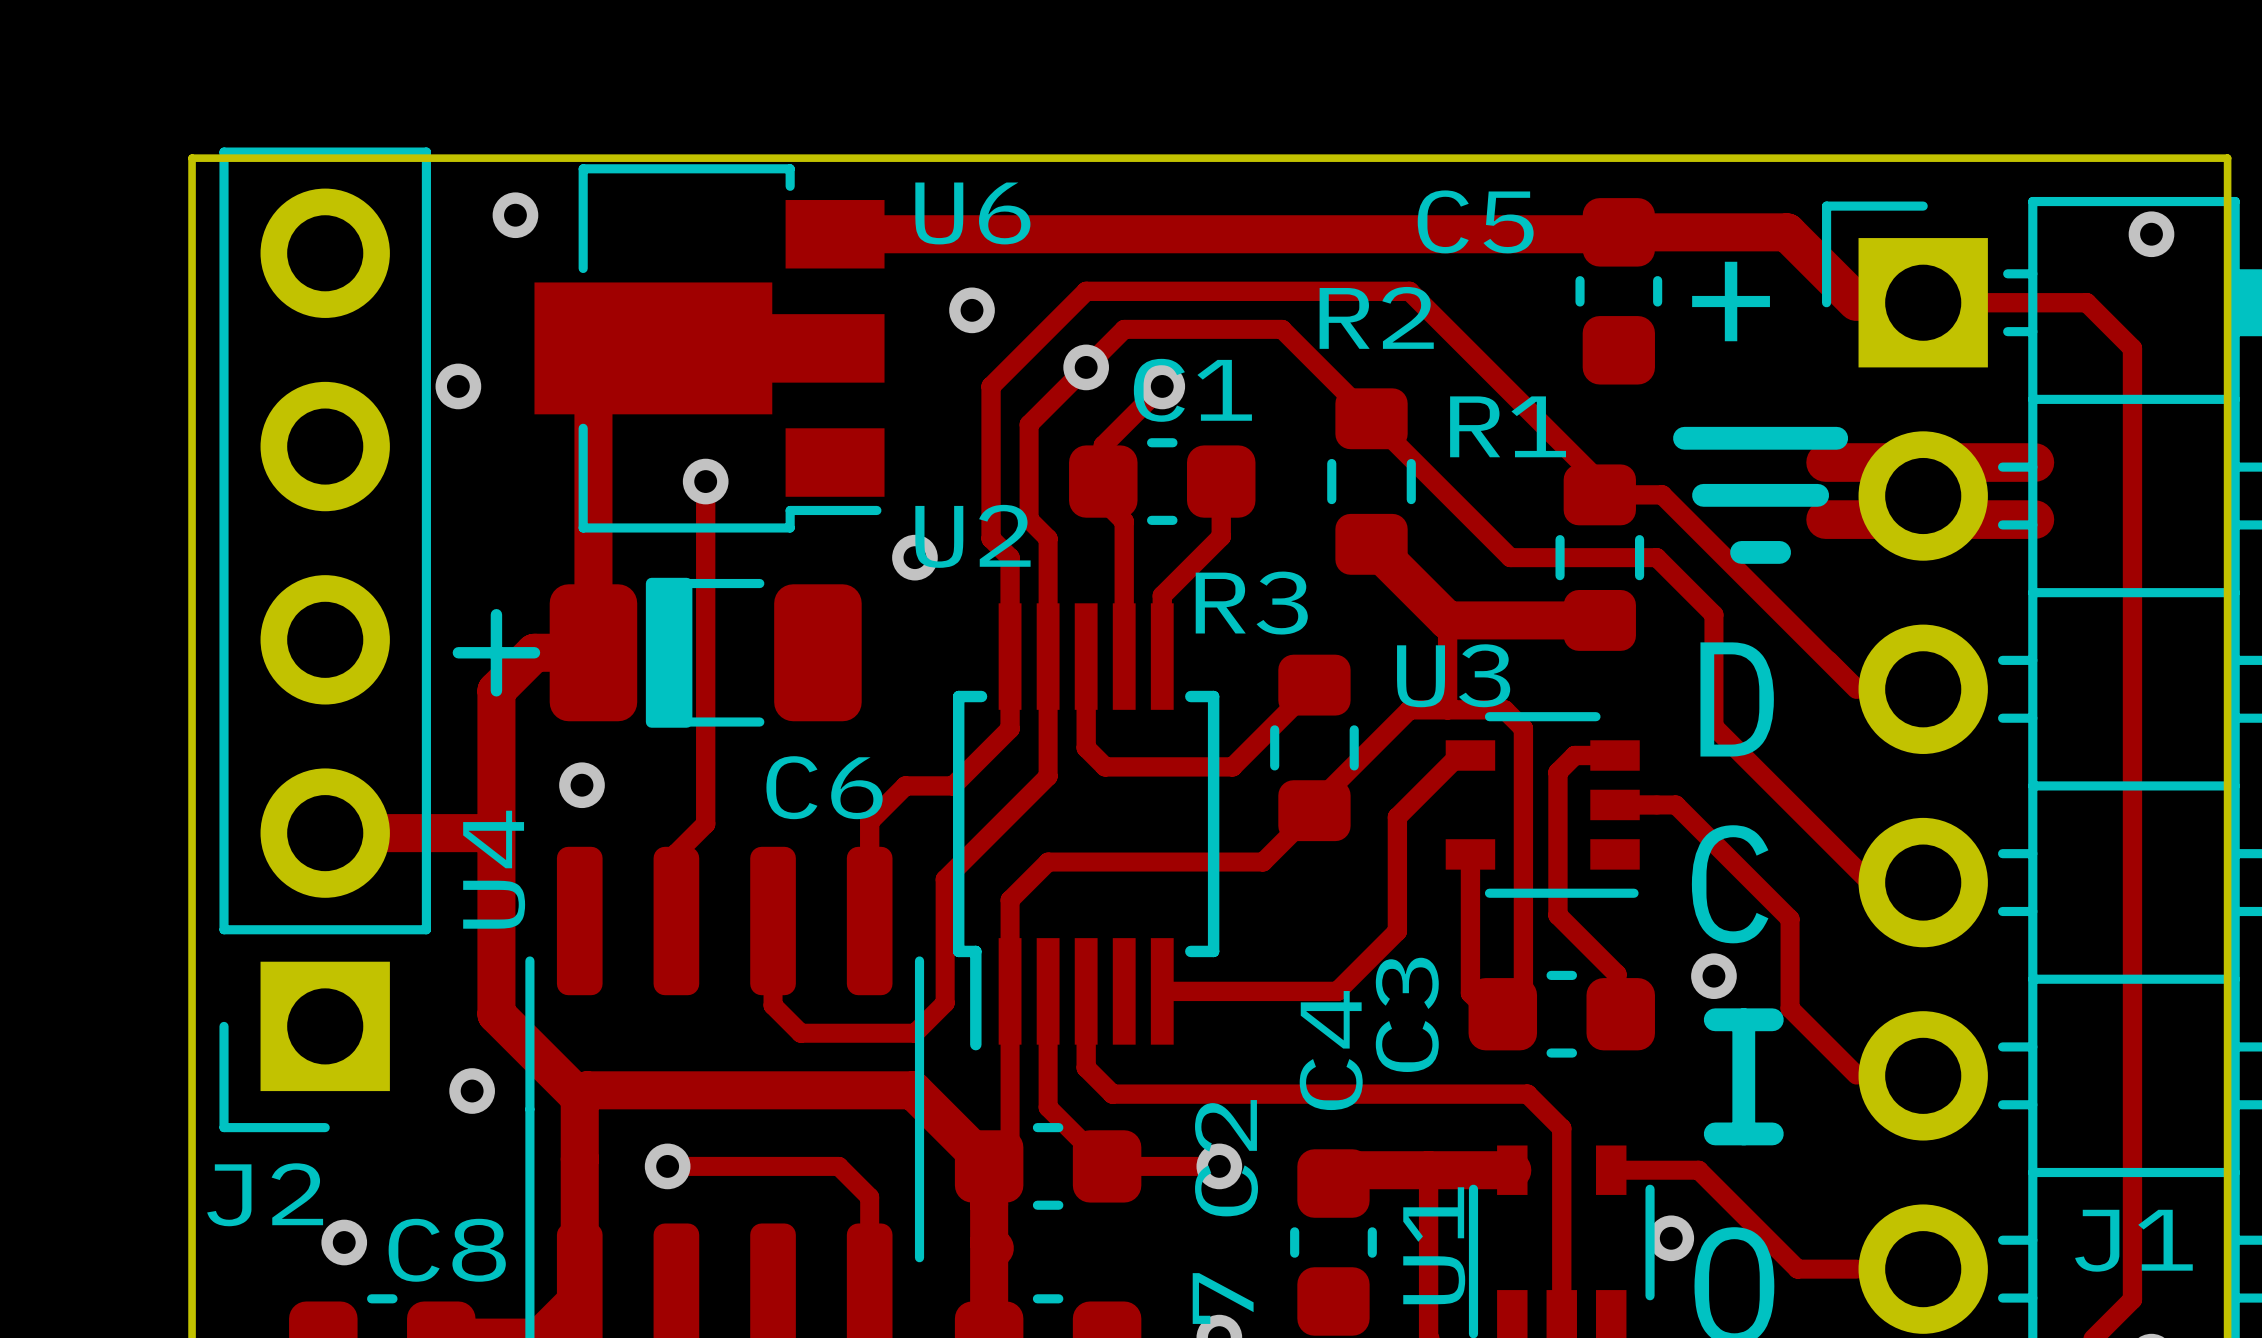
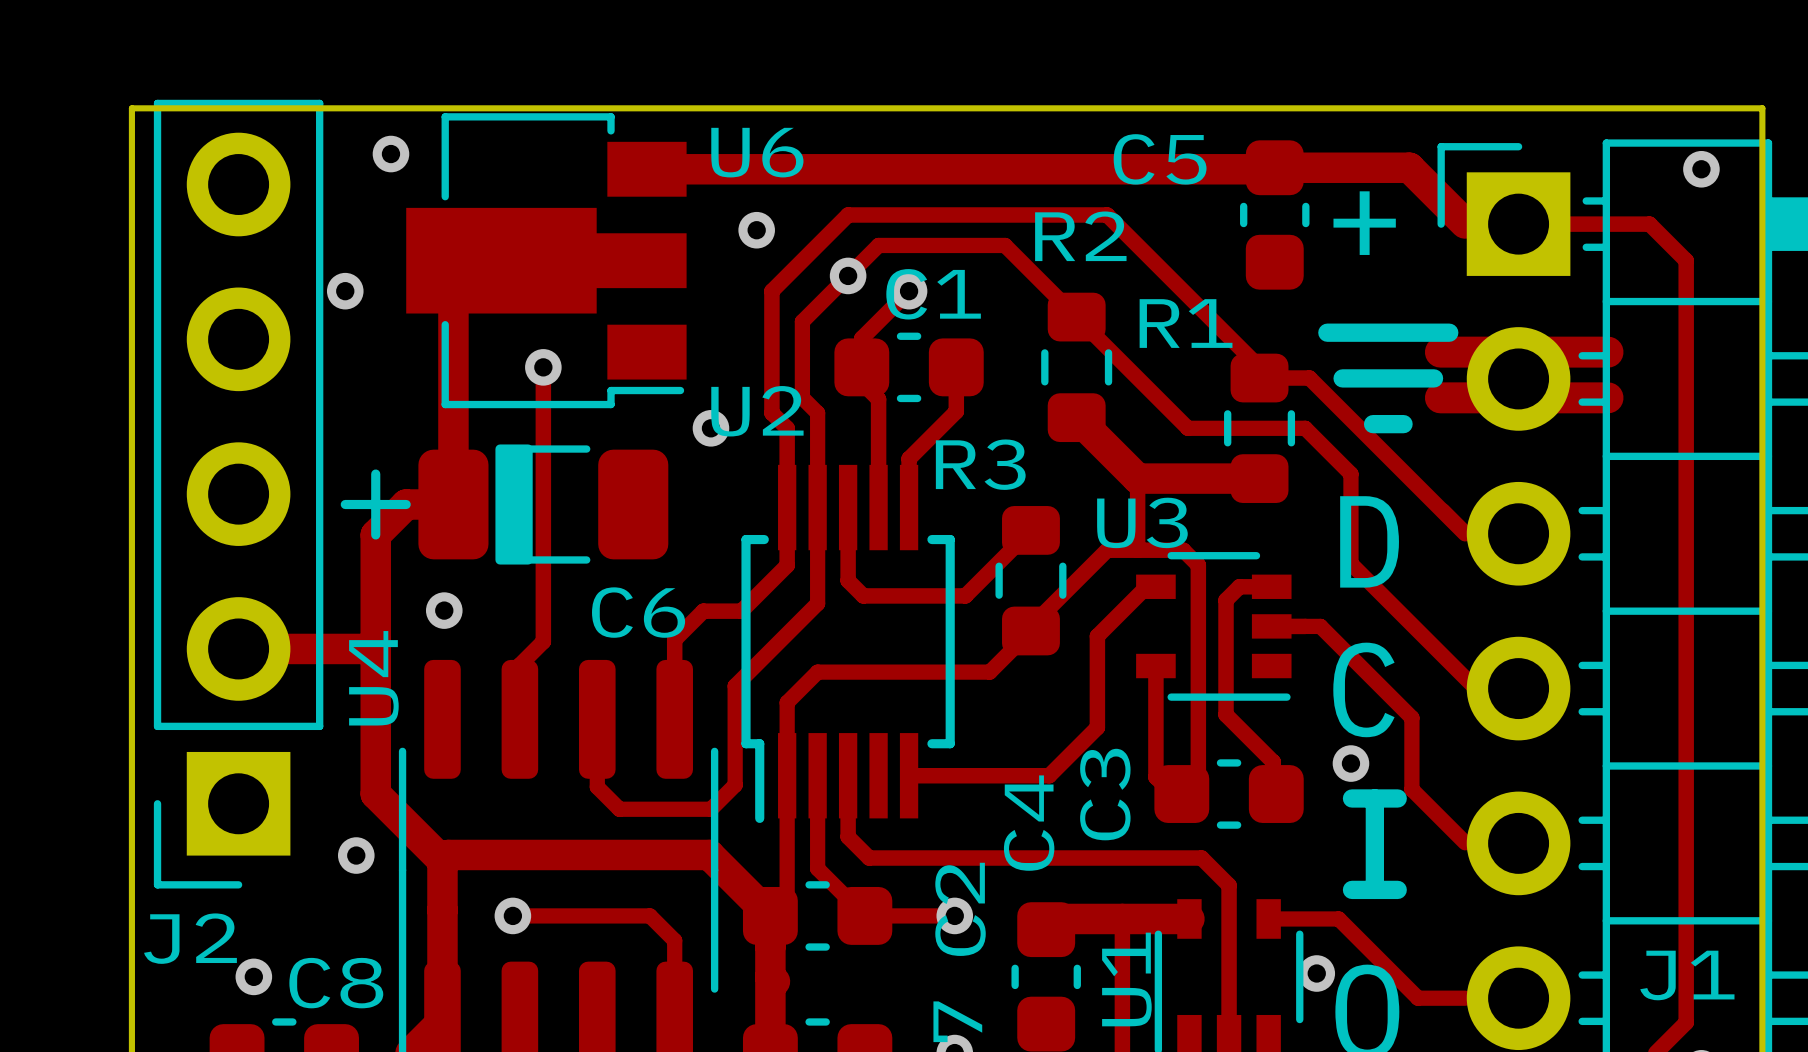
C4 name position: C4 (1331, 1050) -> C4 (1029, 823)

